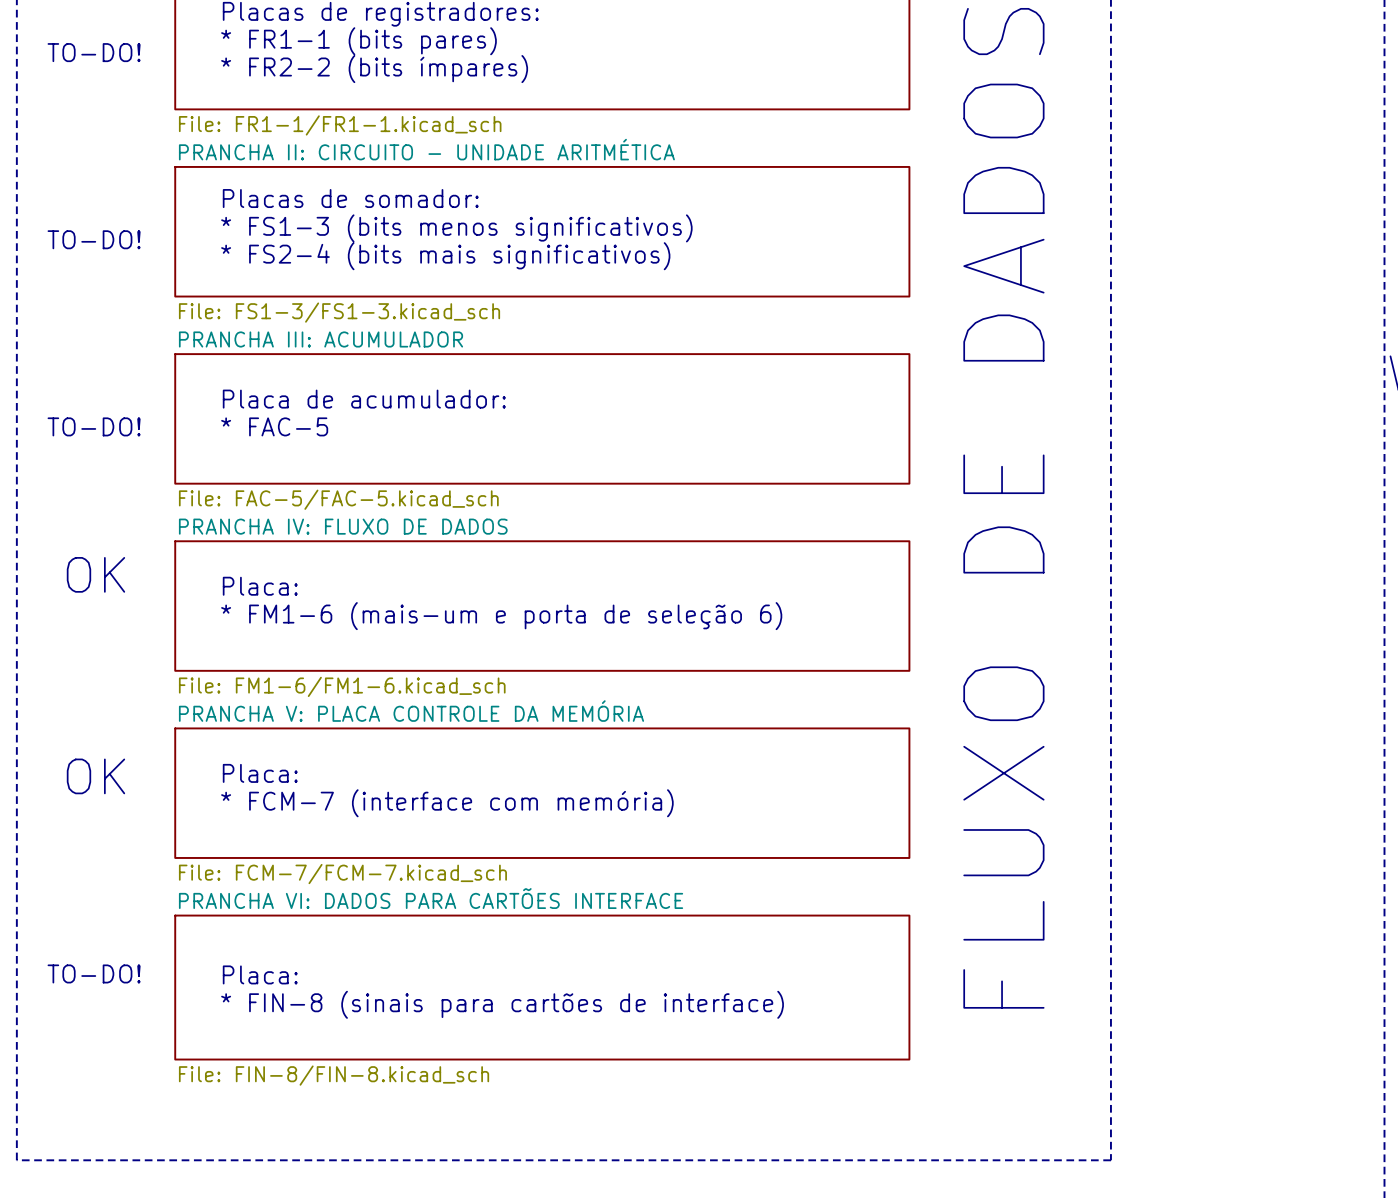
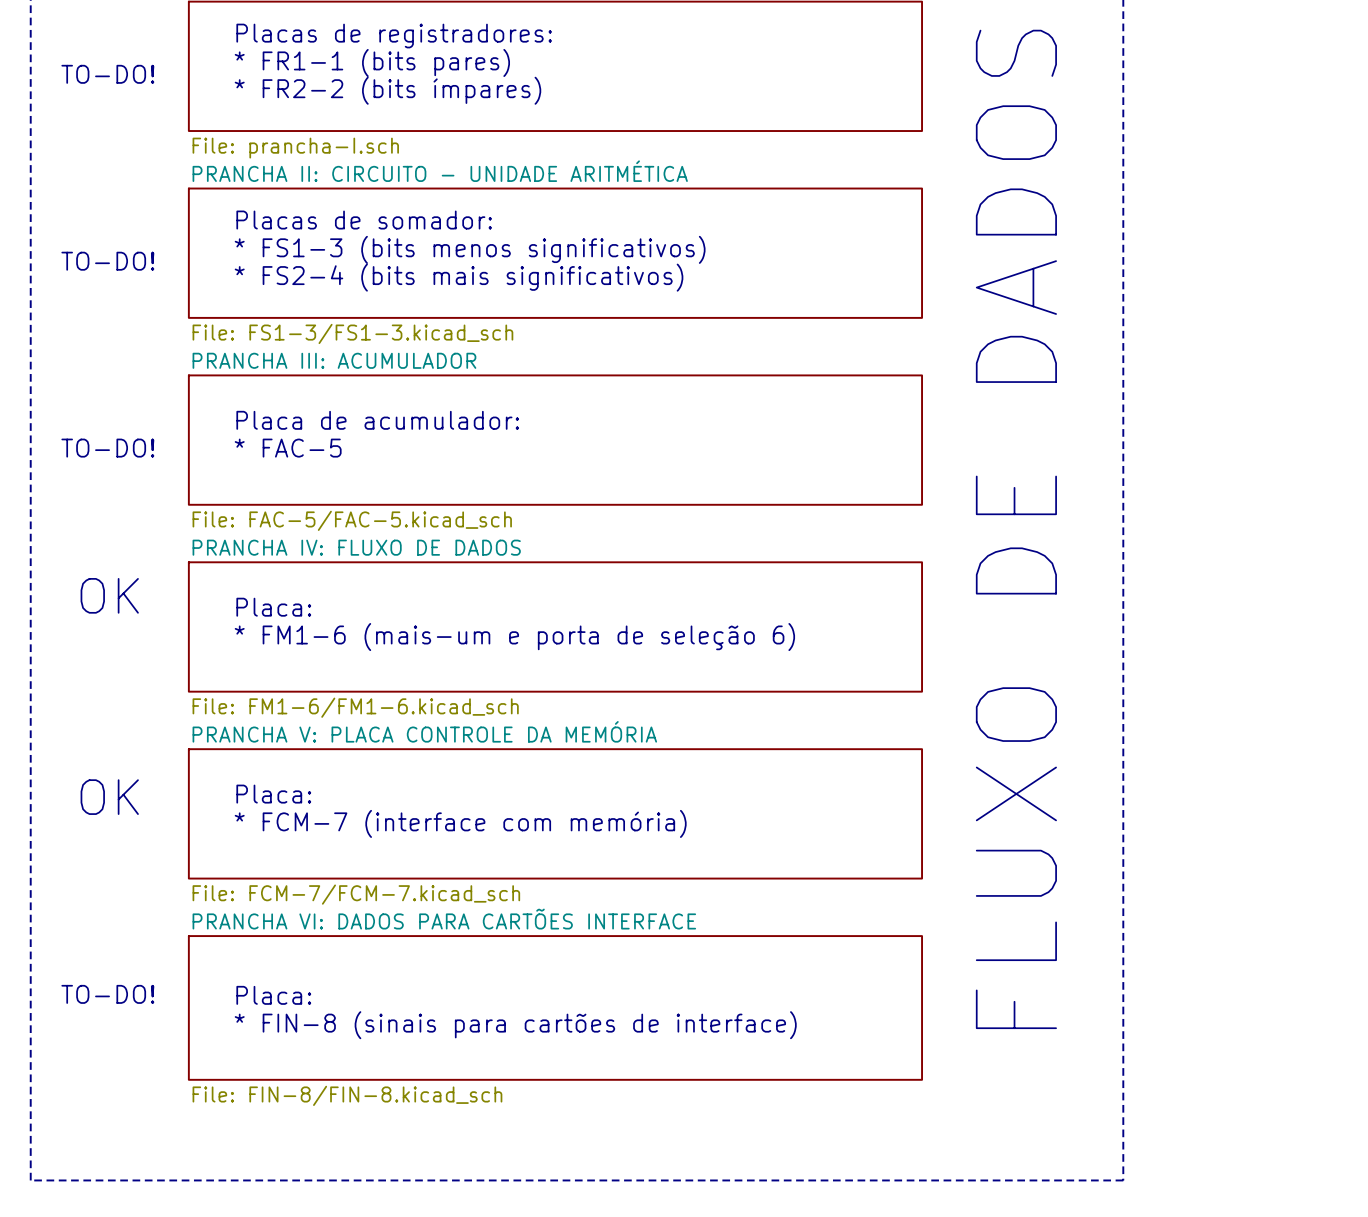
sheet value: File: FR1-1/FR1-1.kicad_sch (340, 125) -> File: prancha-I.sch (295, 148)

